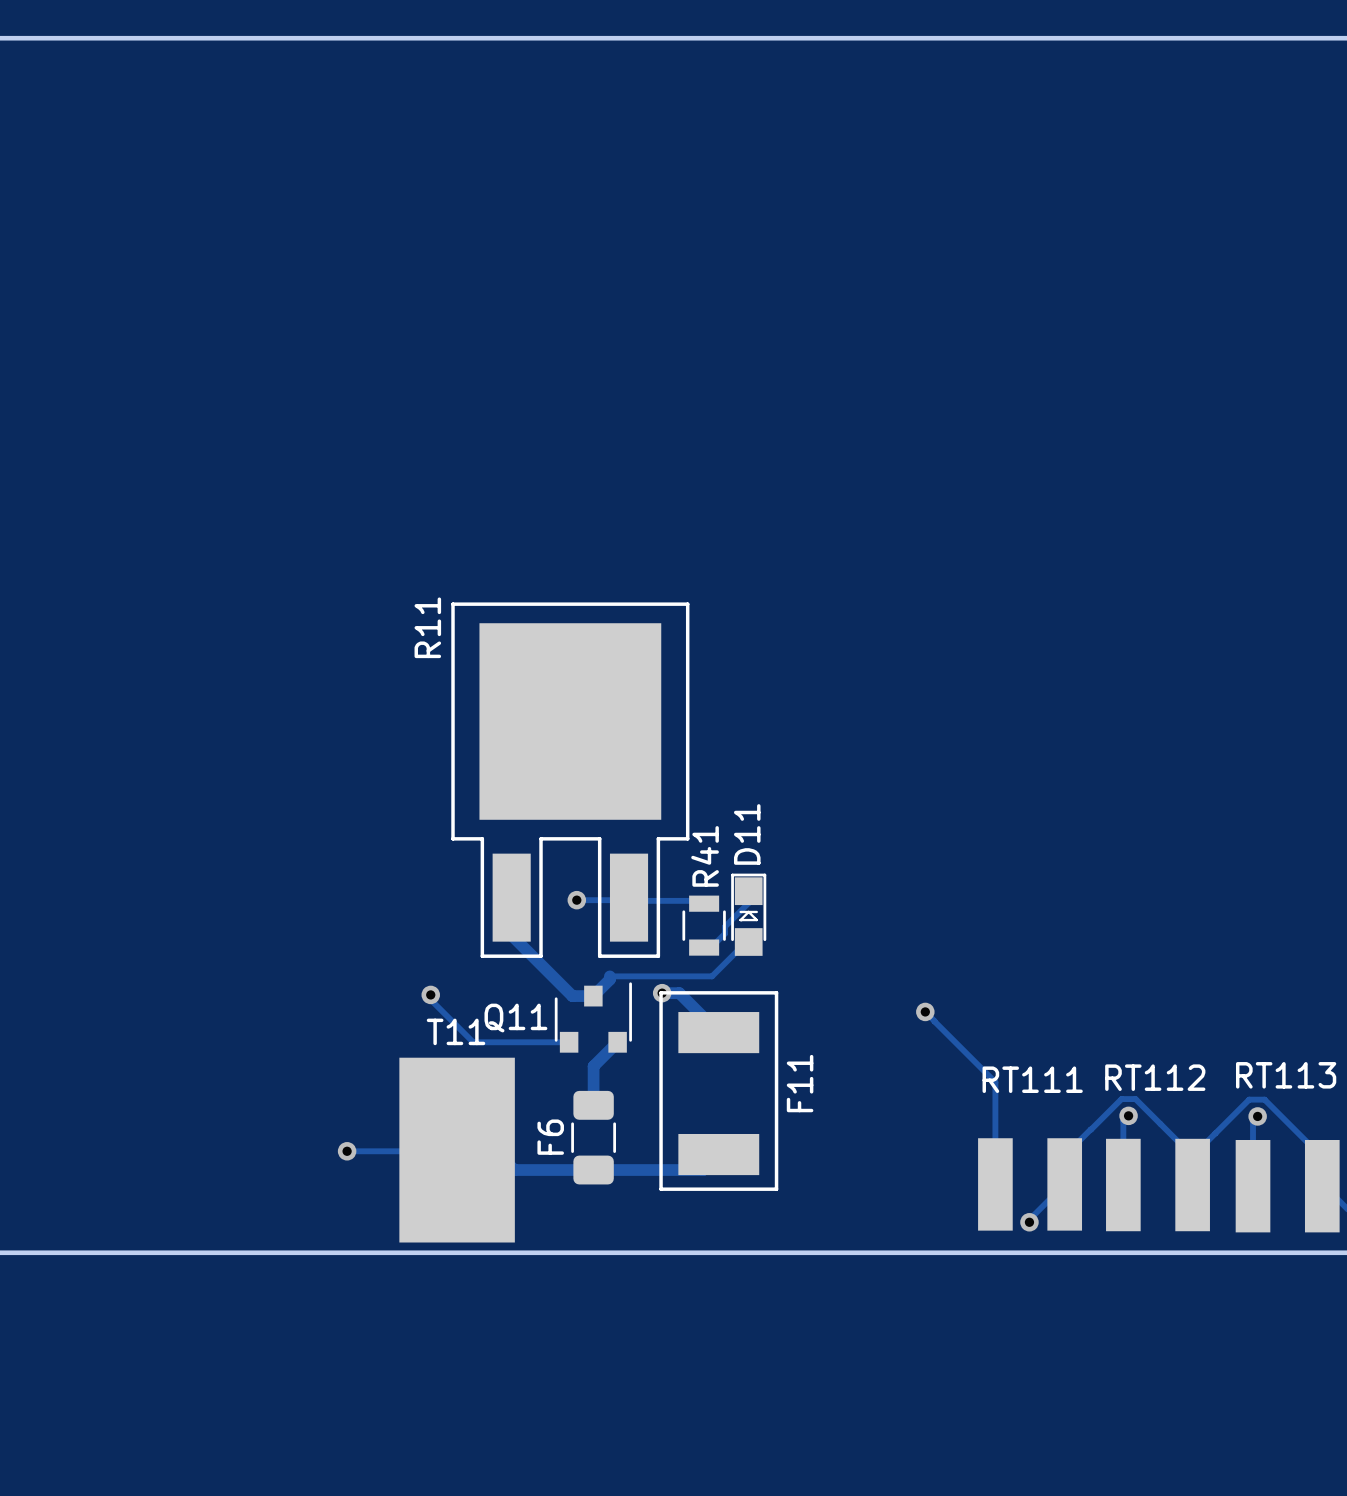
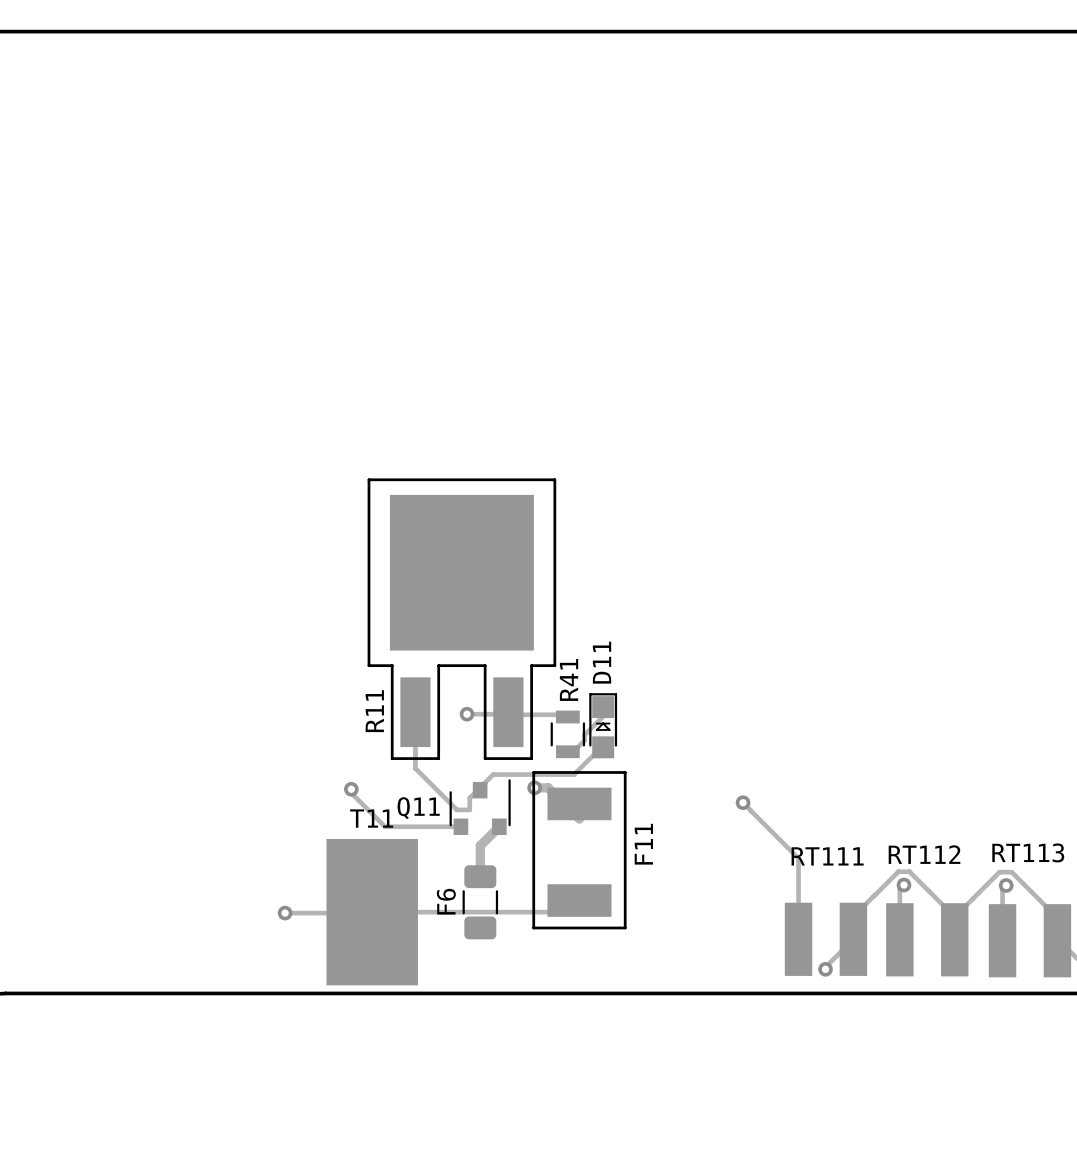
R11 name position: R11 (427, 627) -> R11 (374, 711)
track: (511, 935) (572, 996) (593, 996) (609, 979) (609, 976) -> (415, 742) (415, 768) (456, 809) (469, 809) (469, 797) (493, 774)
F11 position: (718, 1091) -> (579, 850)
track: (494, 1150) (514, 1170) (703, 1170) (718, 1154) -> (401, 912) (567, 912) (579, 900)

